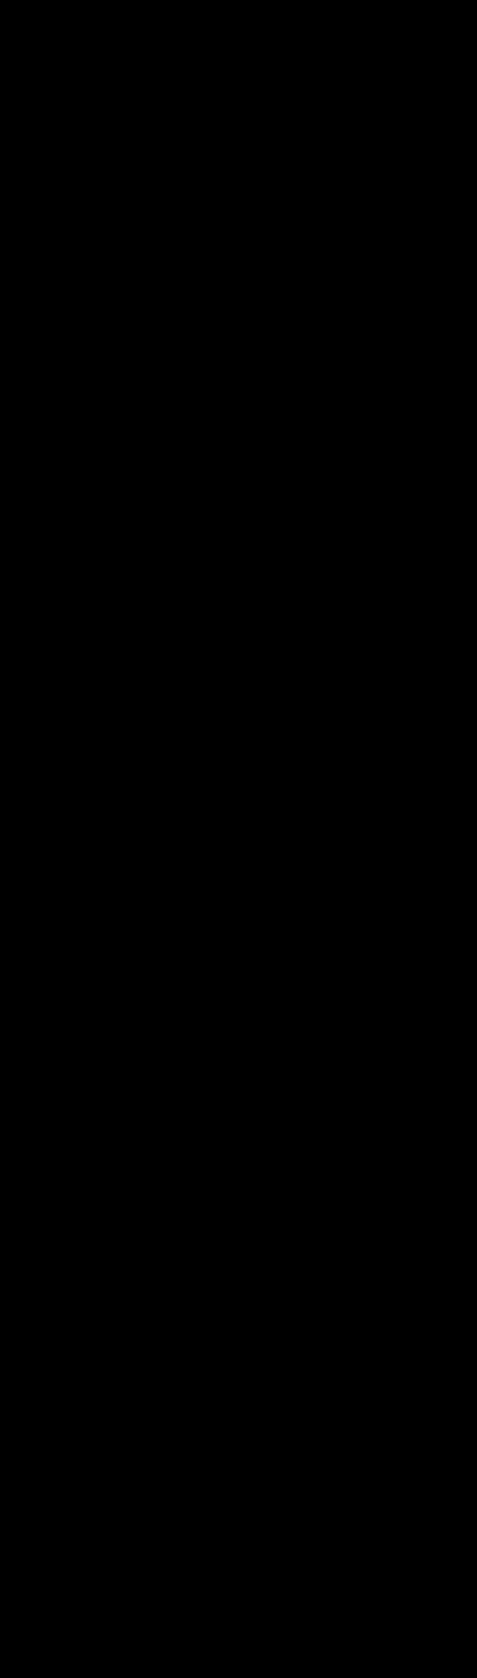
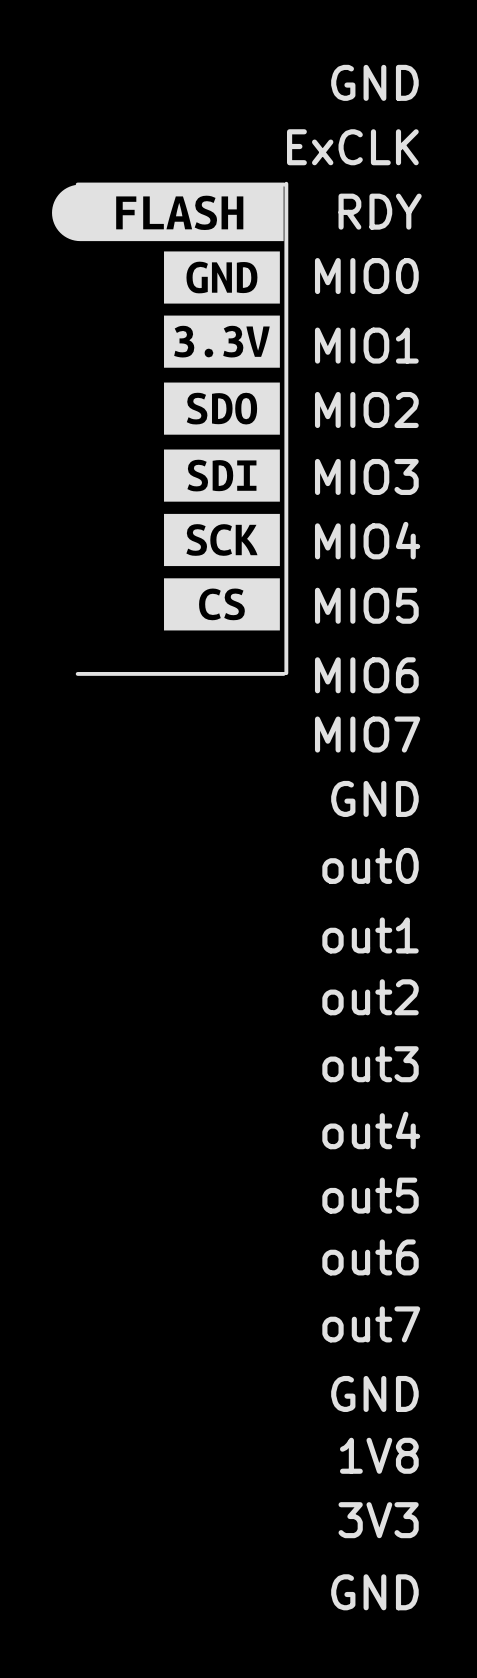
text: none -> GND (374, 82)
text: none -> ExCLK (352, 147)
line: none -> (286, 183) (286, 673)
drawing: none -> [52, 184, 284, 631]
line: none -> (77, 184) (283, 184)
text: none -> RDY (380, 211)
text: none -> MIO0 (366, 276)
text: none -> MIO1 (366, 345)
text: none -> MIO2 (366, 409)
text: none -> MIO3 (366, 476)
text: none -> MIO4 (367, 540)
text: none -> MIO5 (366, 605)
line: none -> (77, 673) (283, 673)
text: none -> MIO6 (366, 675)
text: none -> MIO7 (367, 734)
text: none -> GND (374, 798)
text: none -> out0 (370, 865)
text: none -> out1 (370, 935)
text: none -> out2 (370, 997)
text: none -> out3 (370, 1064)
text: none -> out4 (371, 1130)
text: none -> out5 (370, 1195)
text: none -> out6 (370, 1257)
text: none -> out7 (371, 1324)
text: none -> GND (374, 1393)
text: none -> 1V8 (379, 1455)
text: none -> 3V3 (378, 1520)
text: none -> GND (374, 1592)

